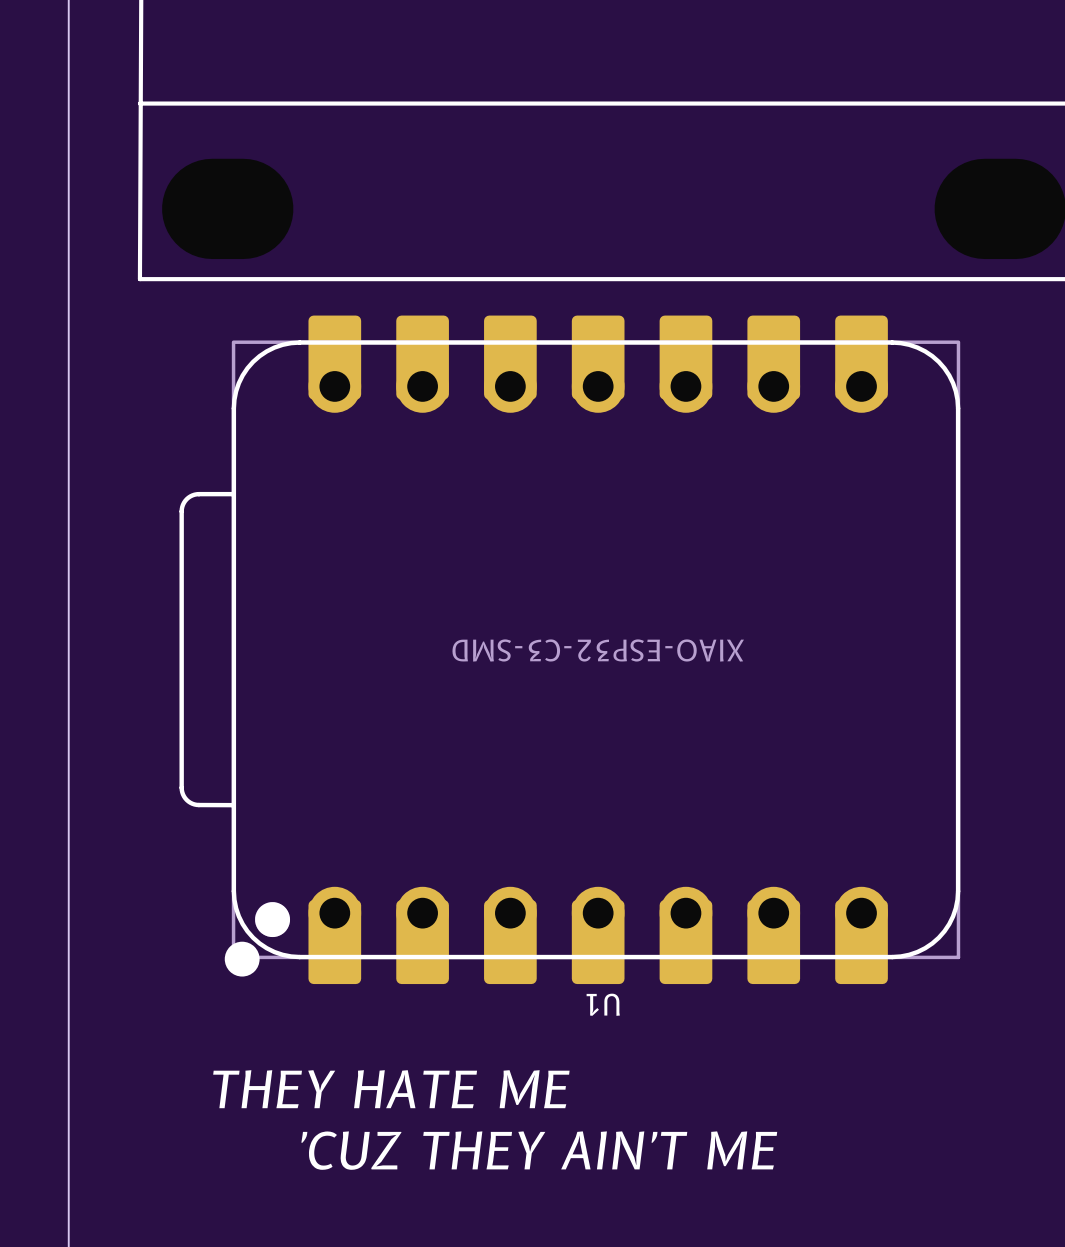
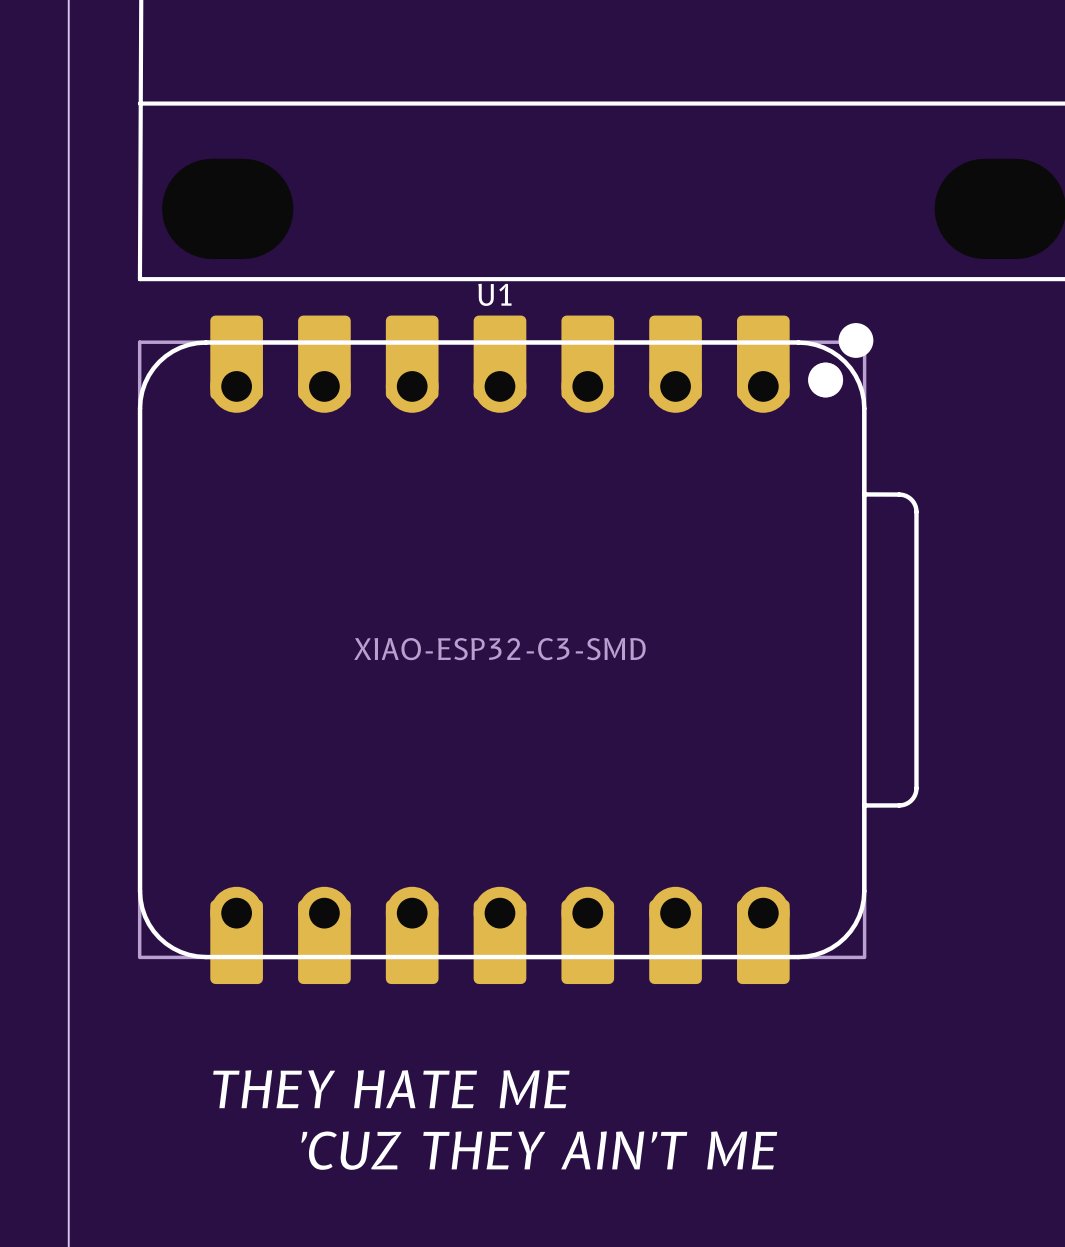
U1 rotation: 0° (569, 649) -> 180° (528, 649)

